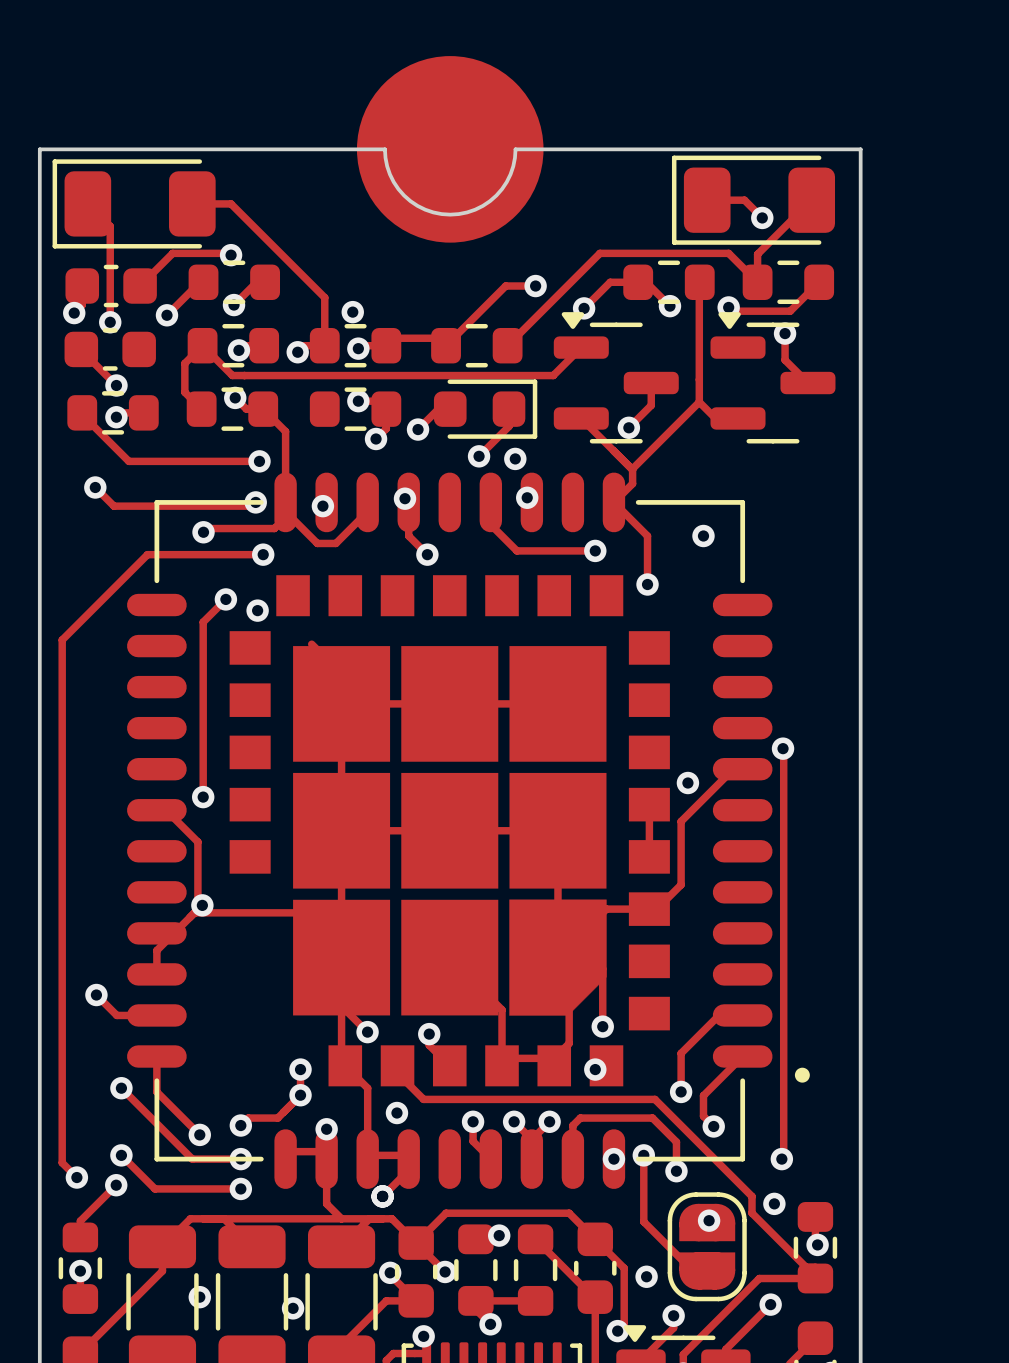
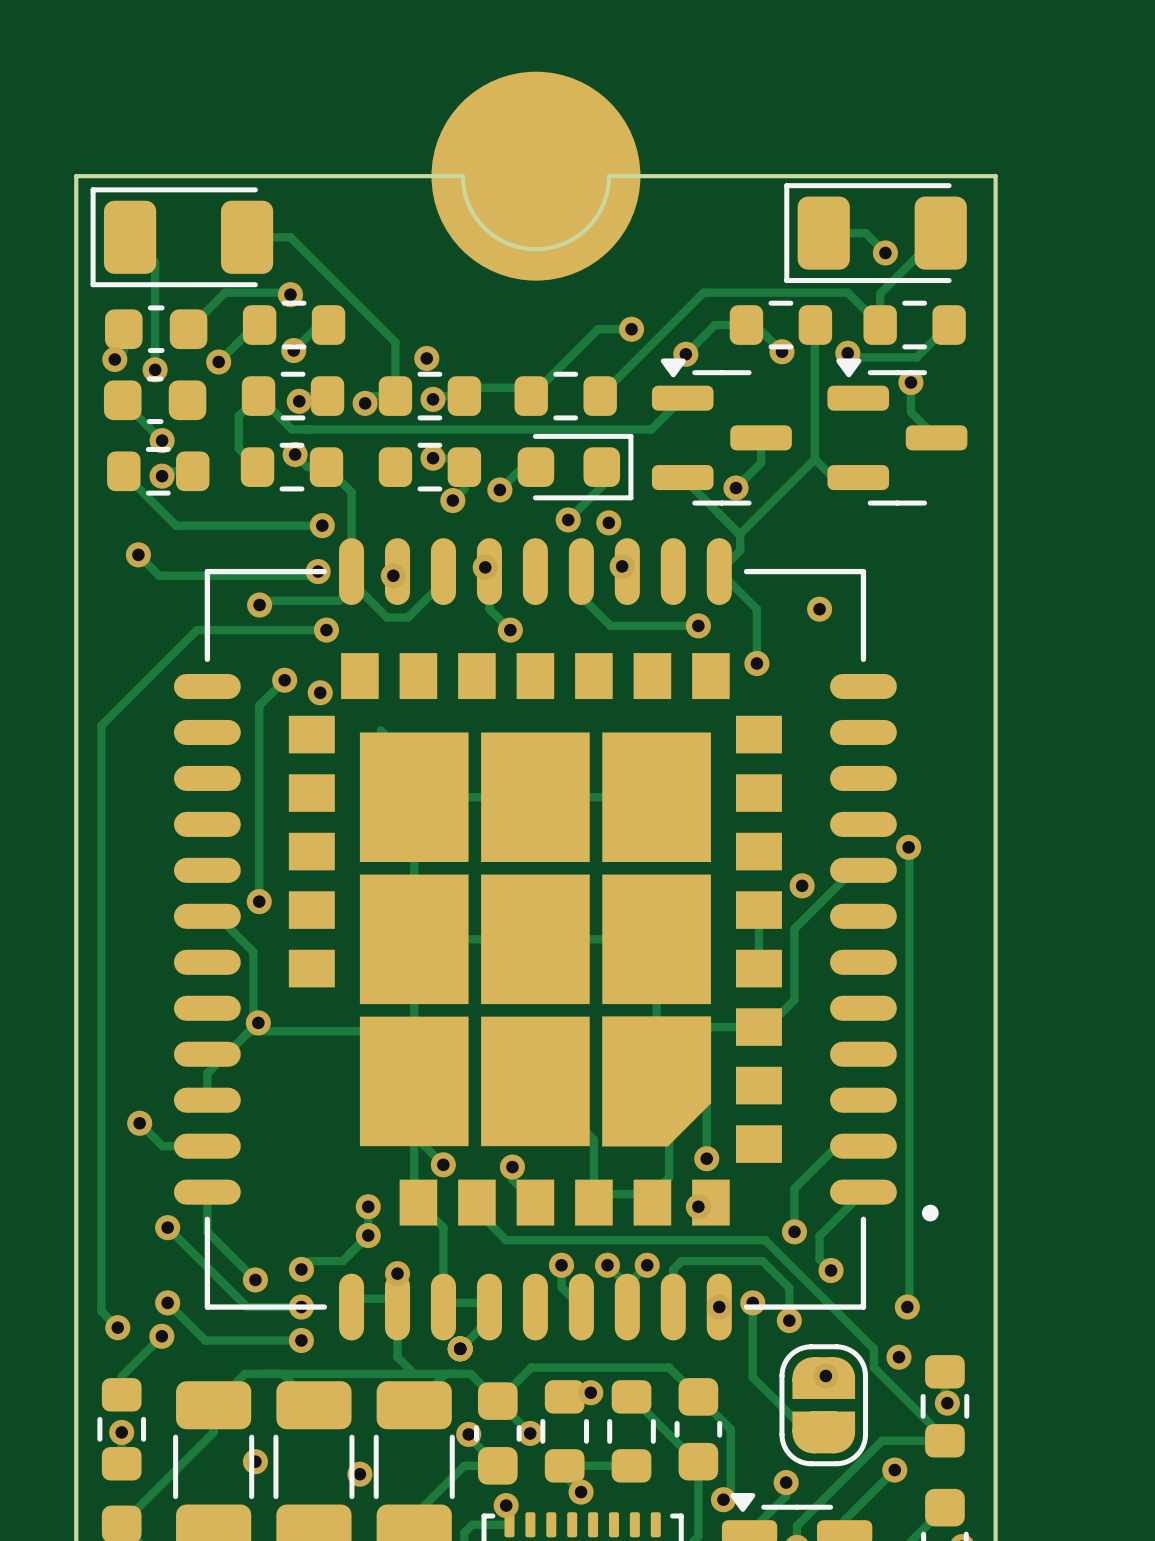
via: (396, 1113) -> none
via: (646, 1276) -> none

